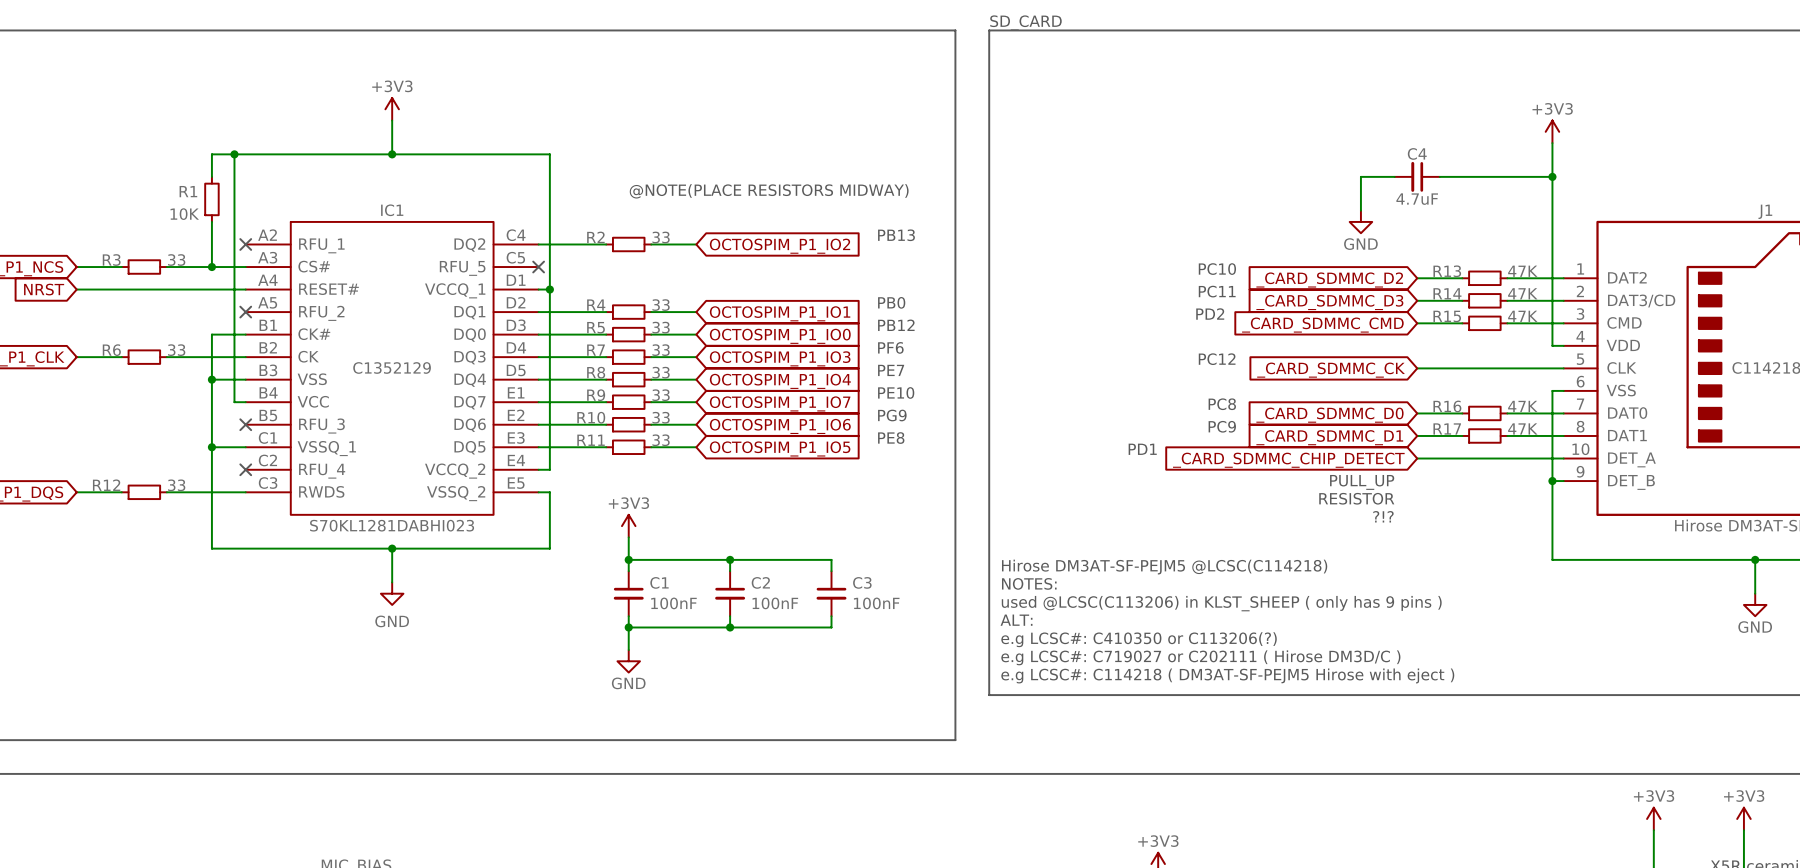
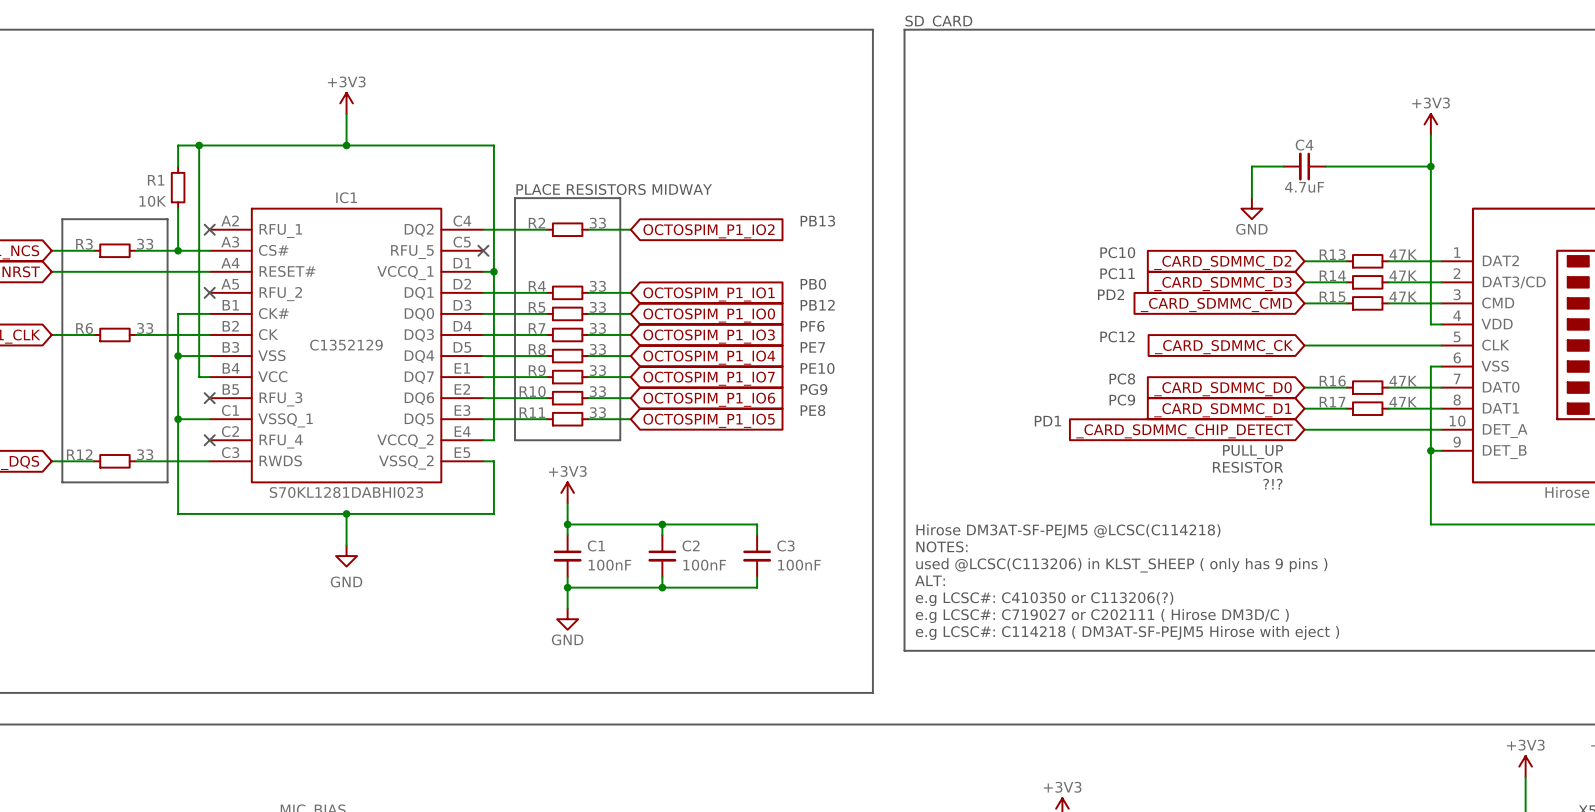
text: @NOTE(PLACE RESISTORS MIDWAY) (769, 191) -> PLACE RESISTORS MIDWAY (614, 189)
line: none -> (514, 198) (620, 198) (620, 440) (514, 440) (514, 198)
line: none -> (62, 219) (167, 219) (167, 482) (62, 482) (62, 219)

